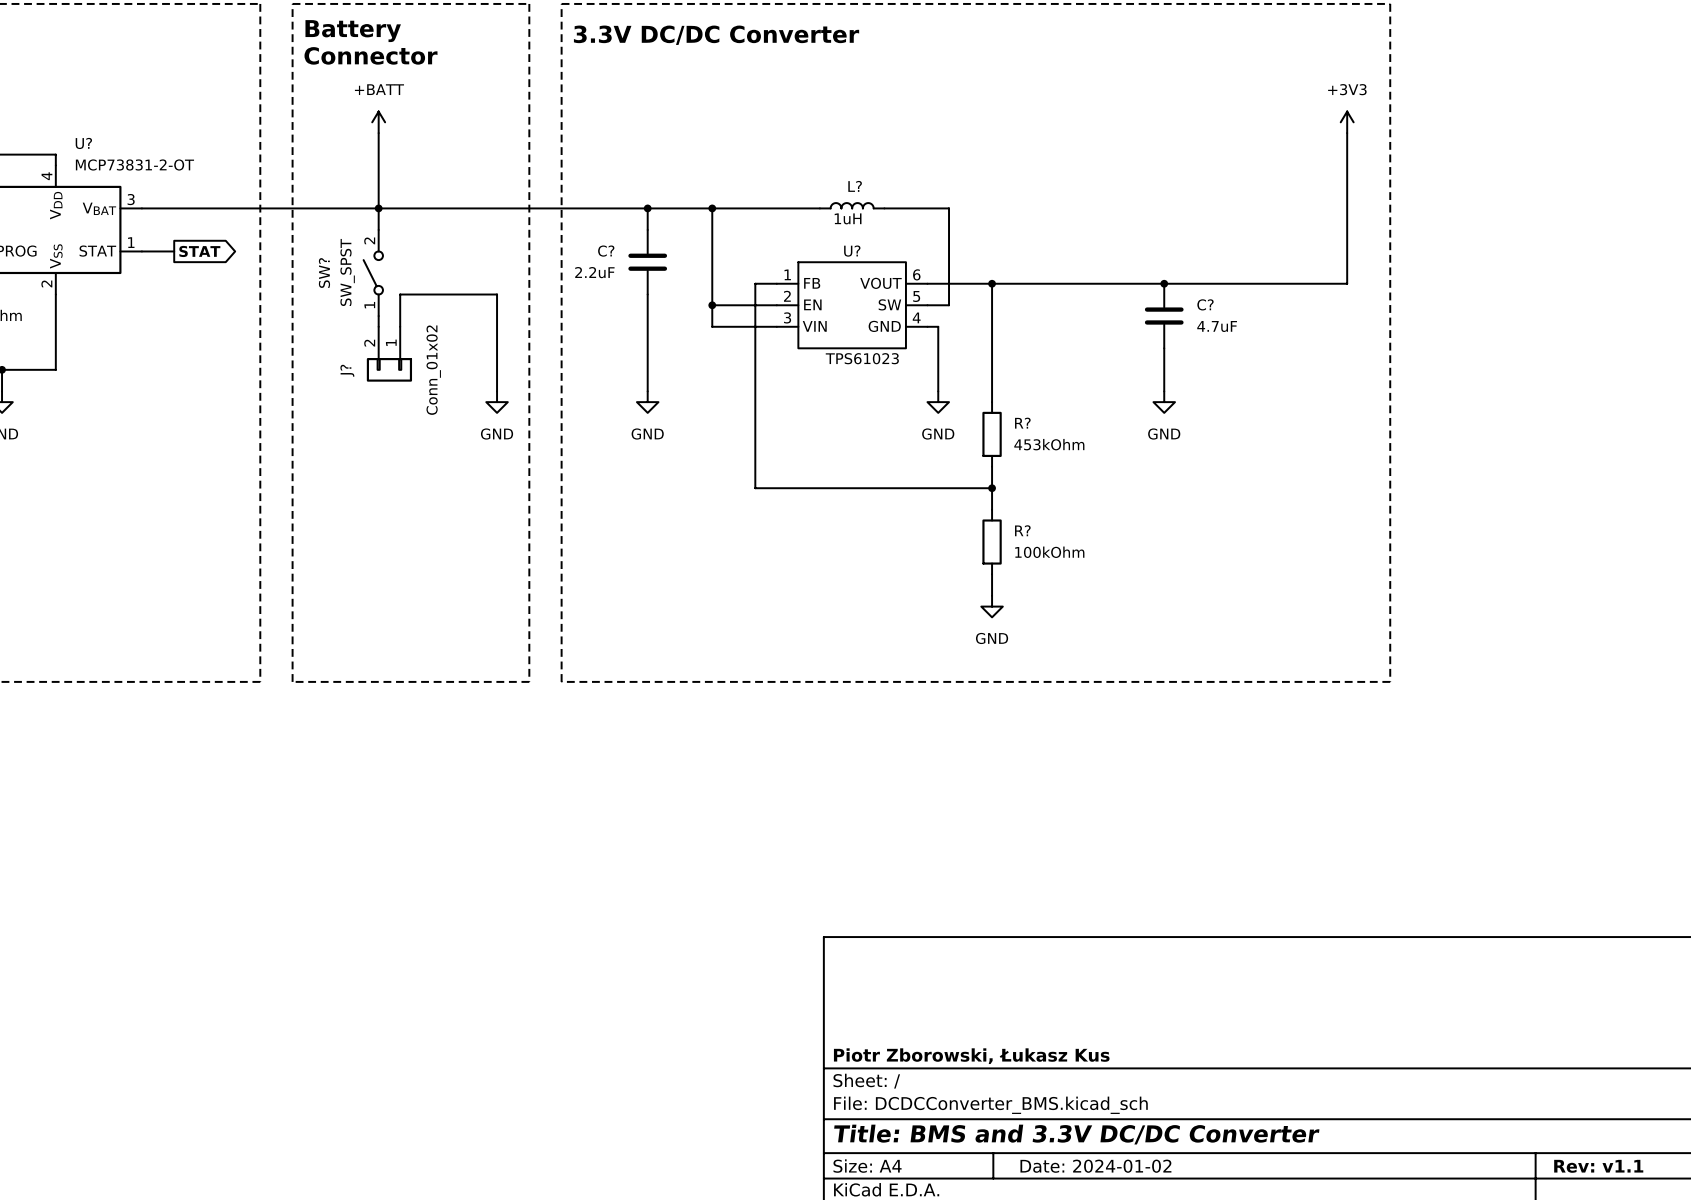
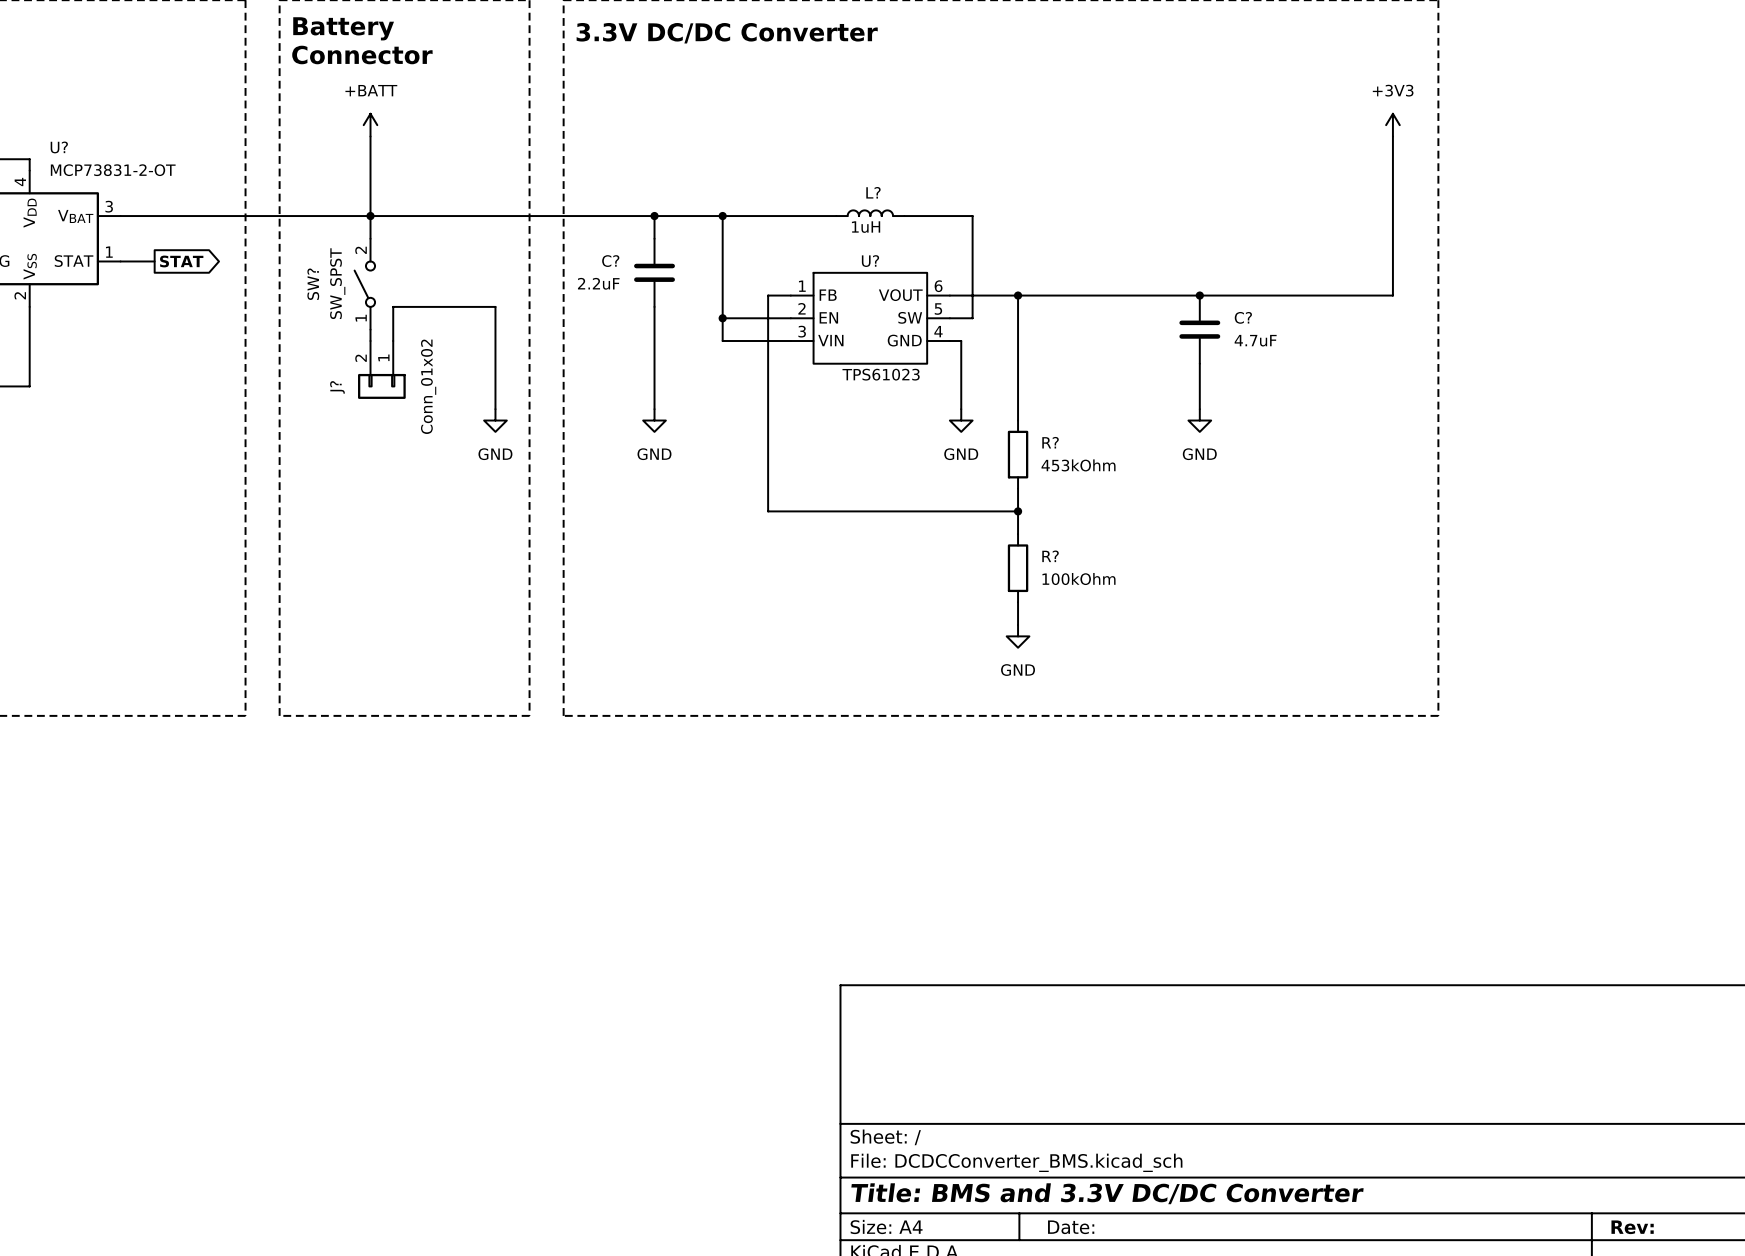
title block: Piotr Zborowski, Łukasz Kus (971, 1056) -> none
title block: Date: 2024-01-02 (1095, 1166) -> Date: (1071, 1227)
title block: Rev: v1.1 (1598, 1166) -> Rev: (1632, 1227)

